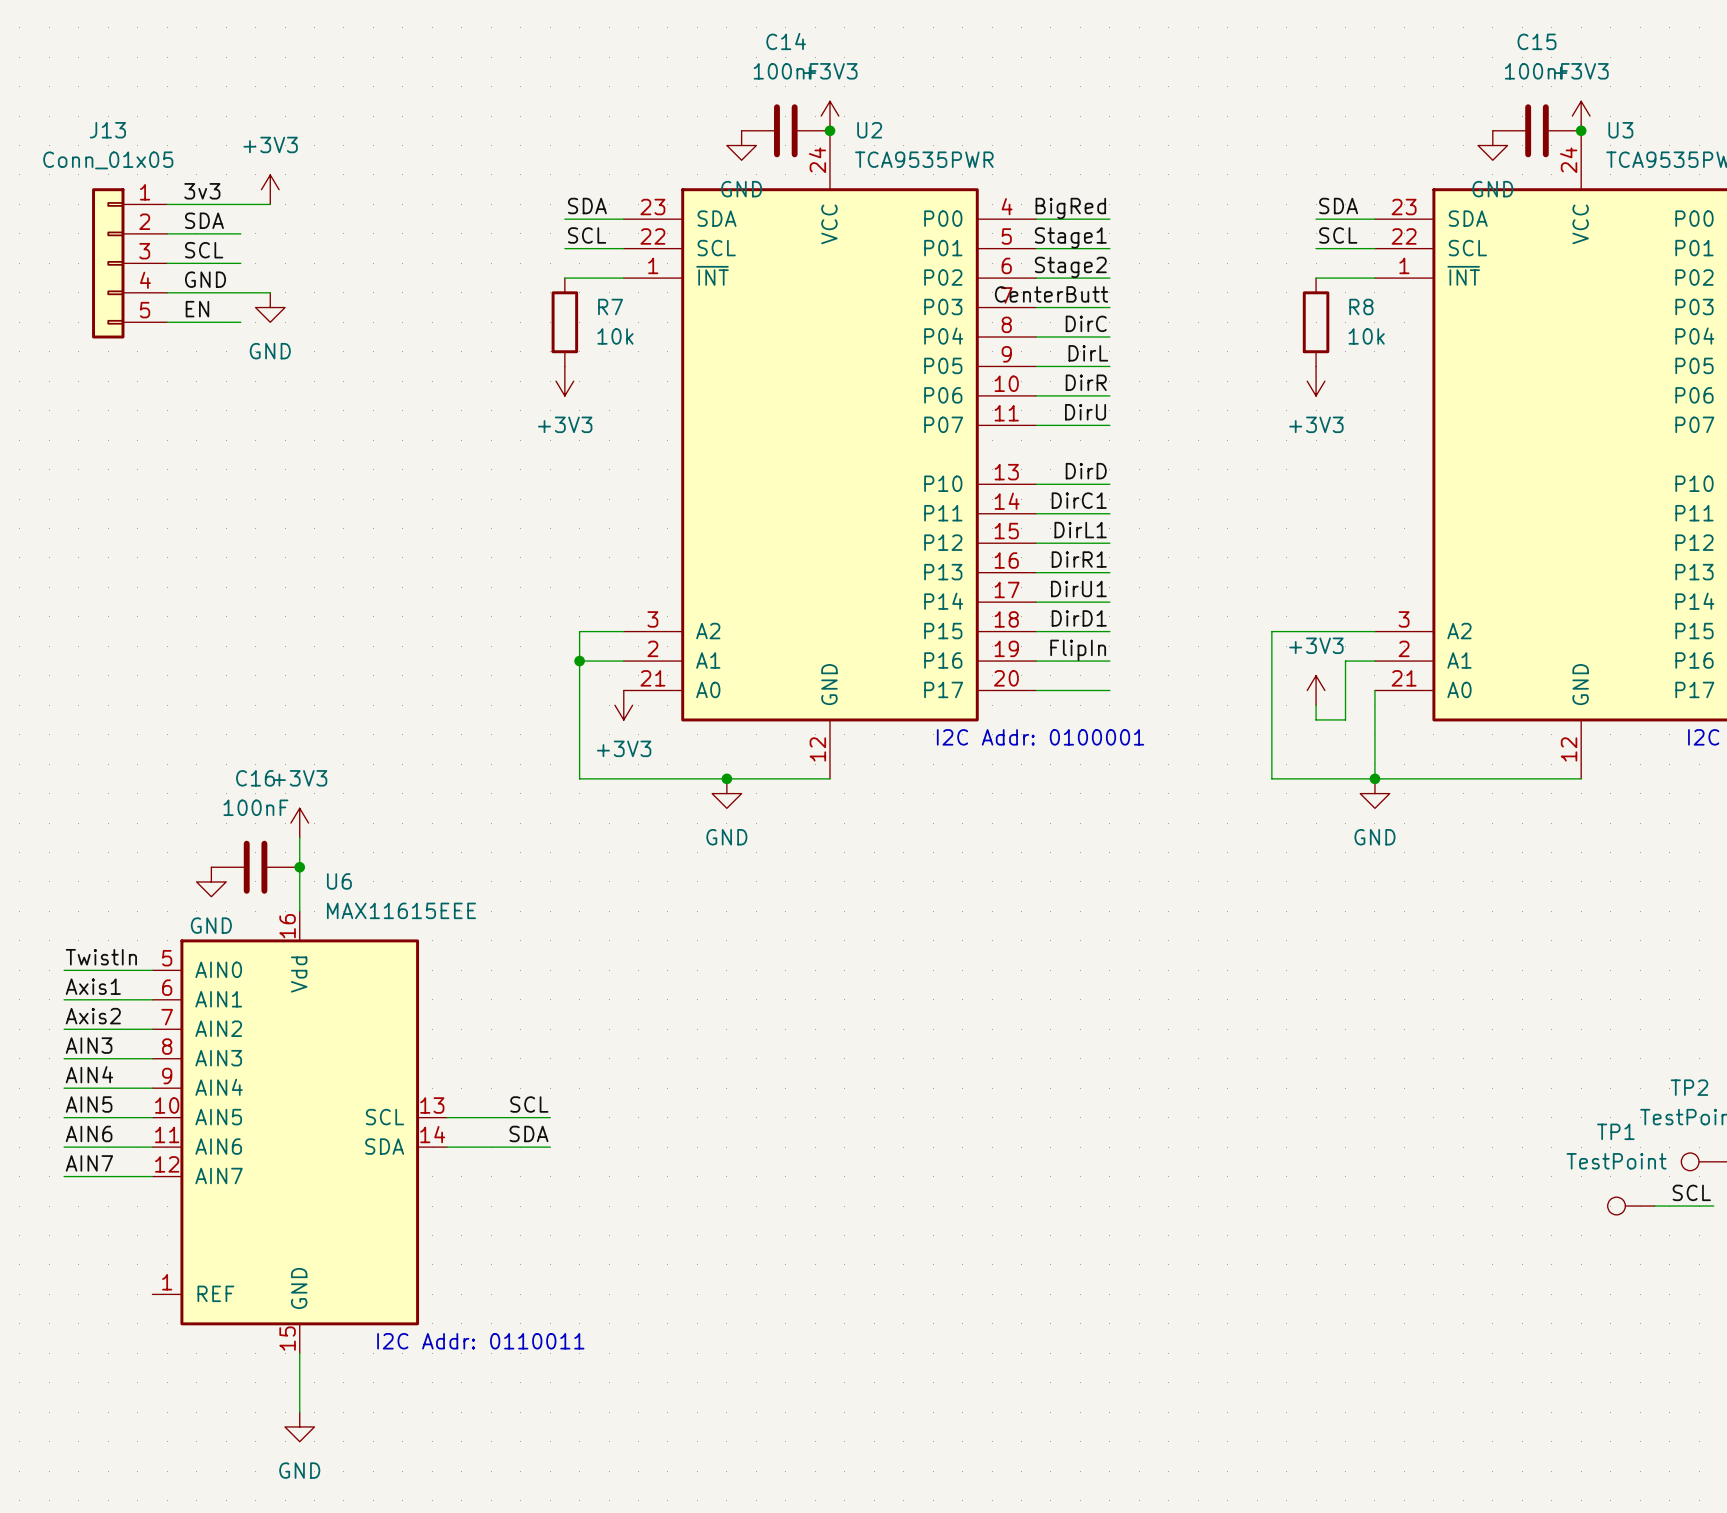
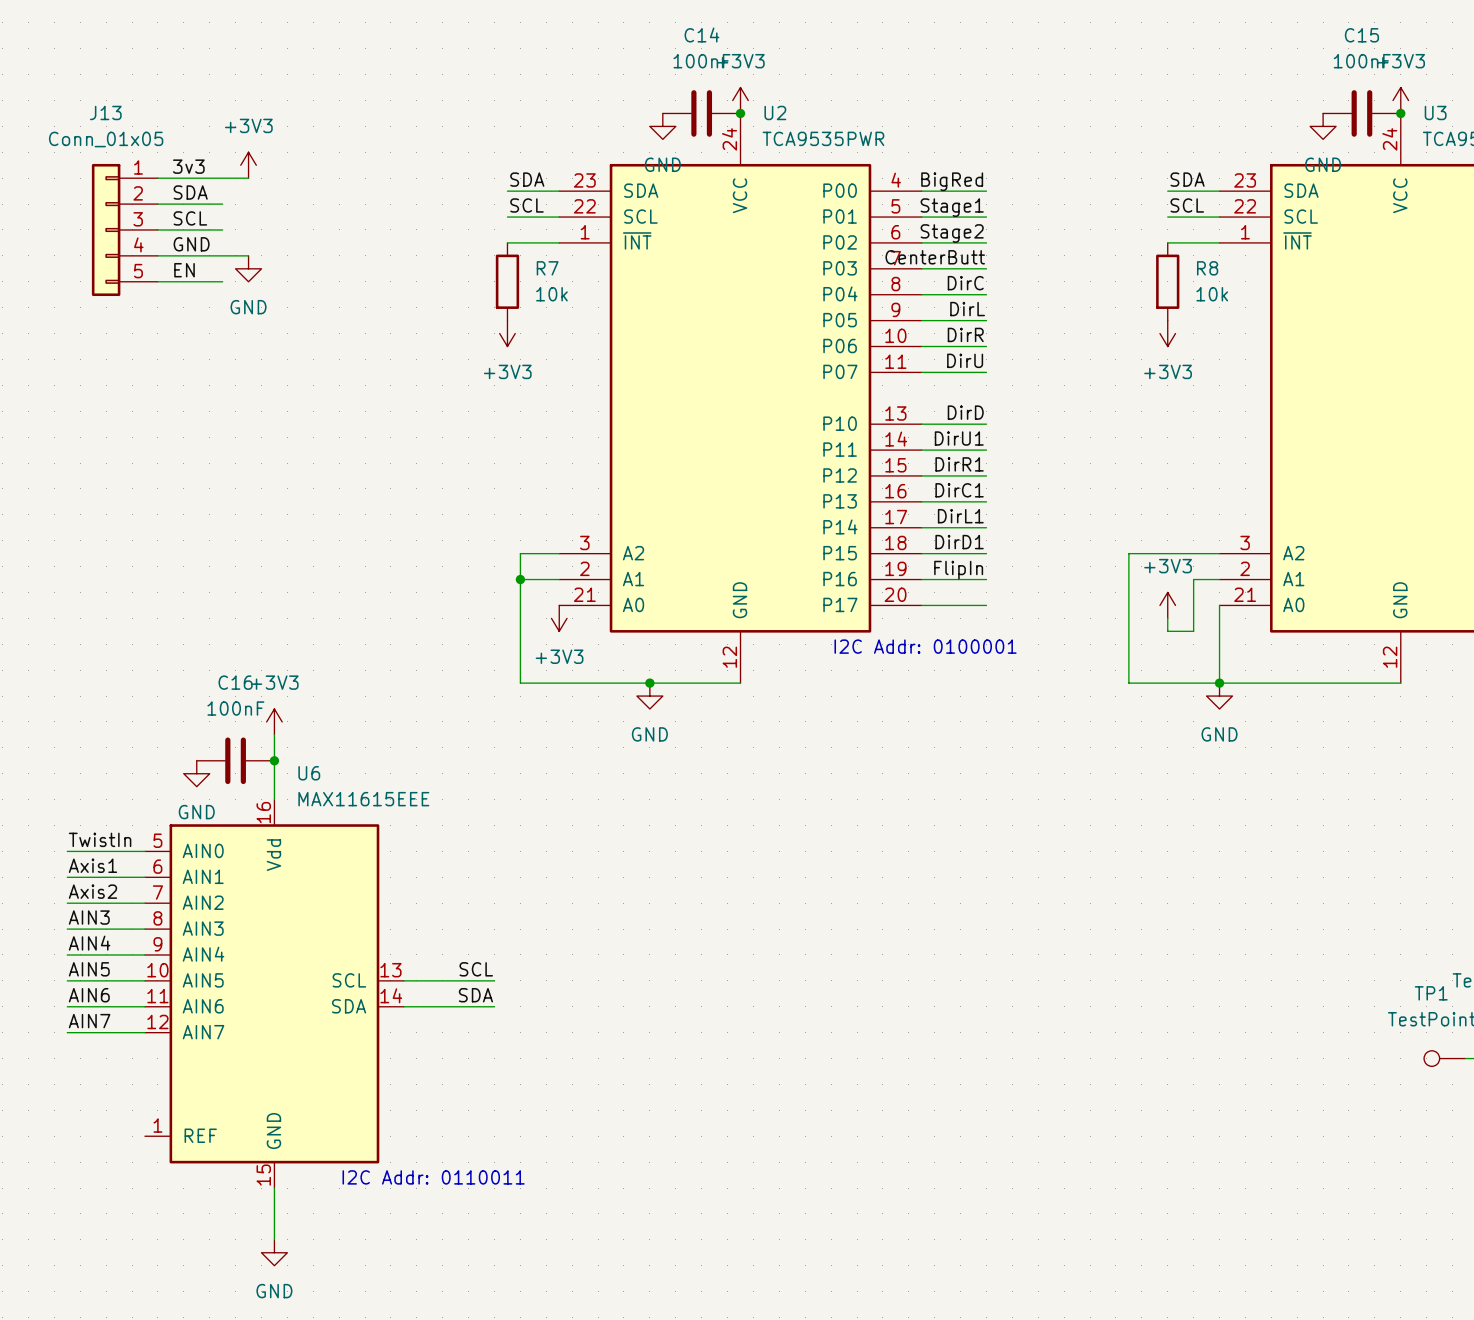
label: DirC1 (1079, 500) -> DirU1 (959, 438)
label: DirL1 (1080, 530) -> DirR1 (959, 464)
label: DirR1 (1079, 559) -> DirC1 (959, 490)
label: DirU1 (1078, 588) -> DirL1 (960, 516)

